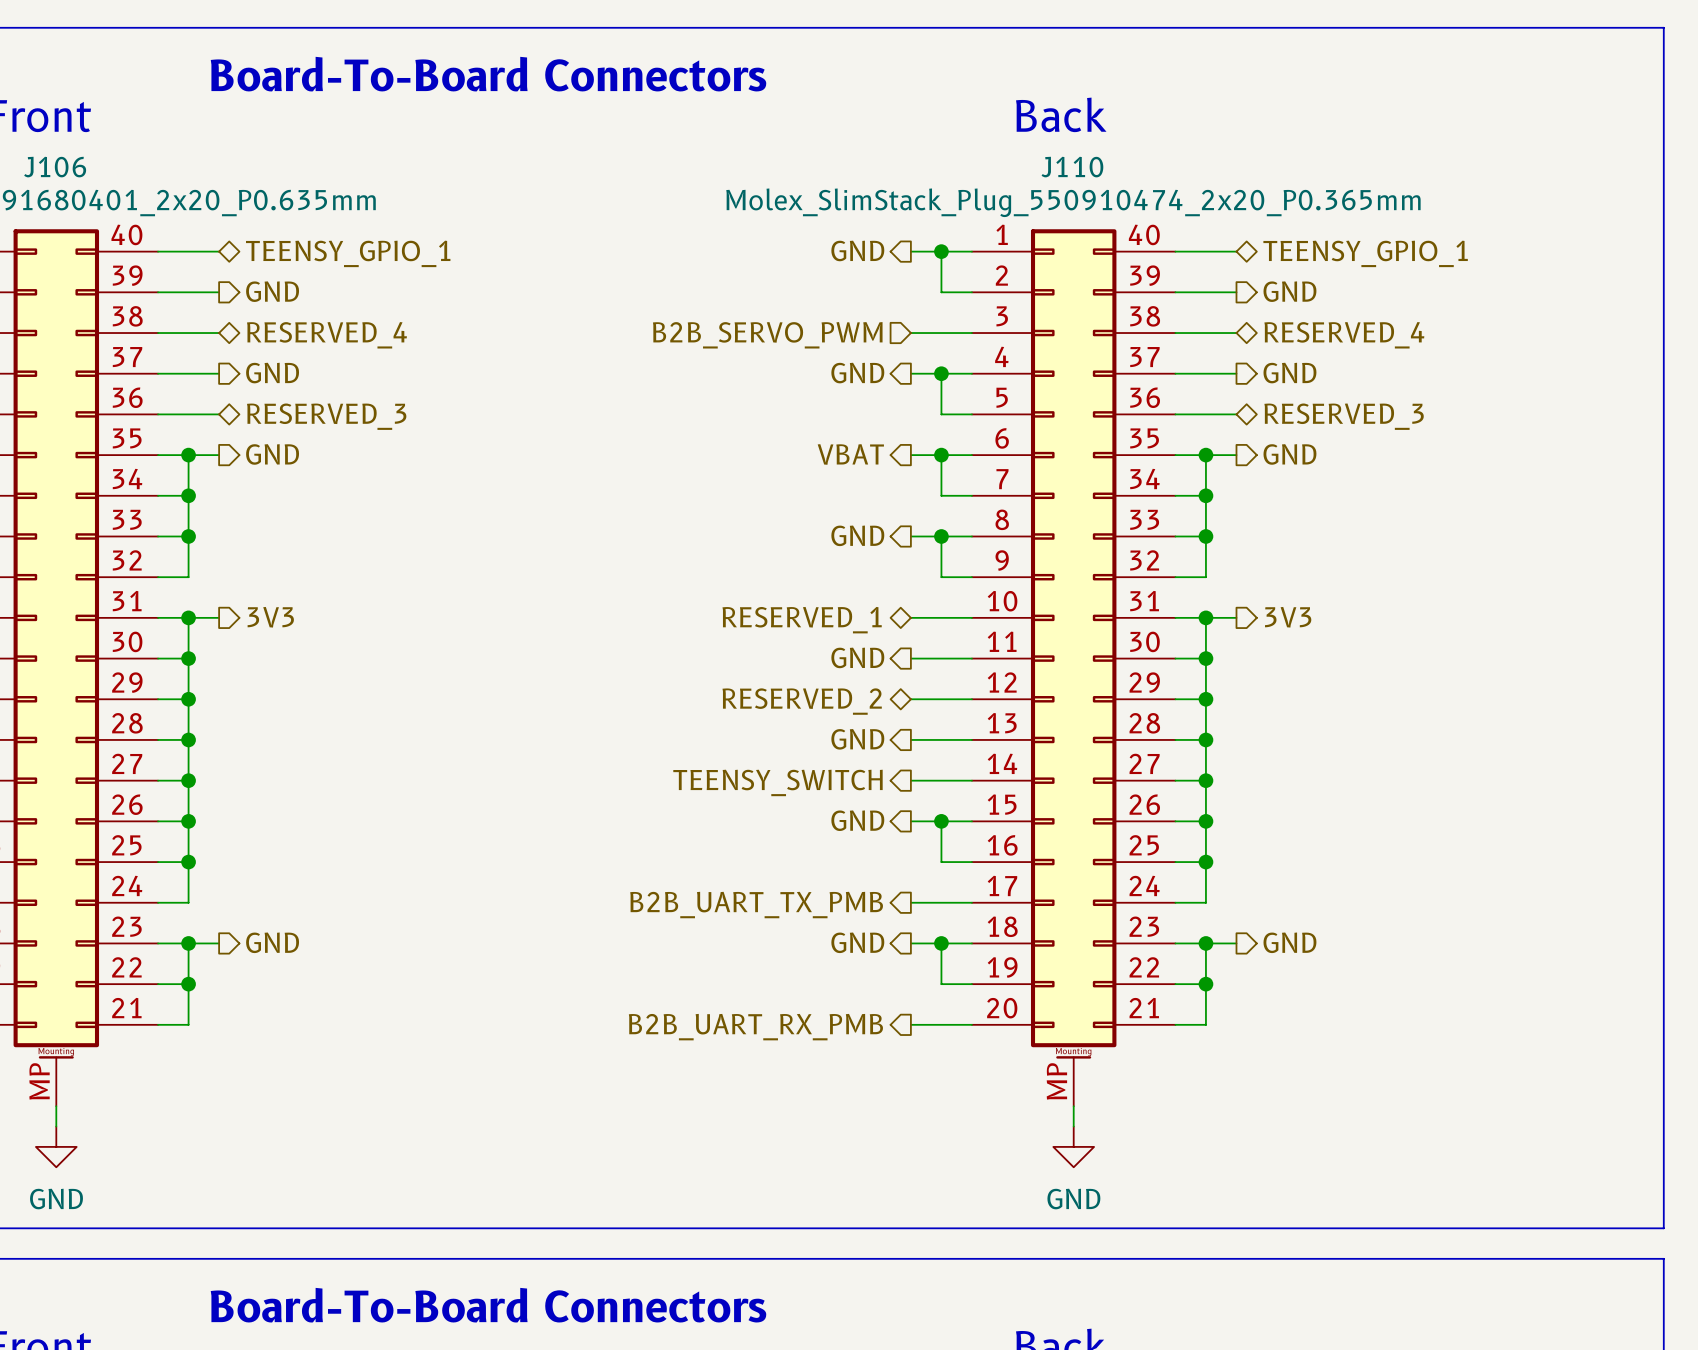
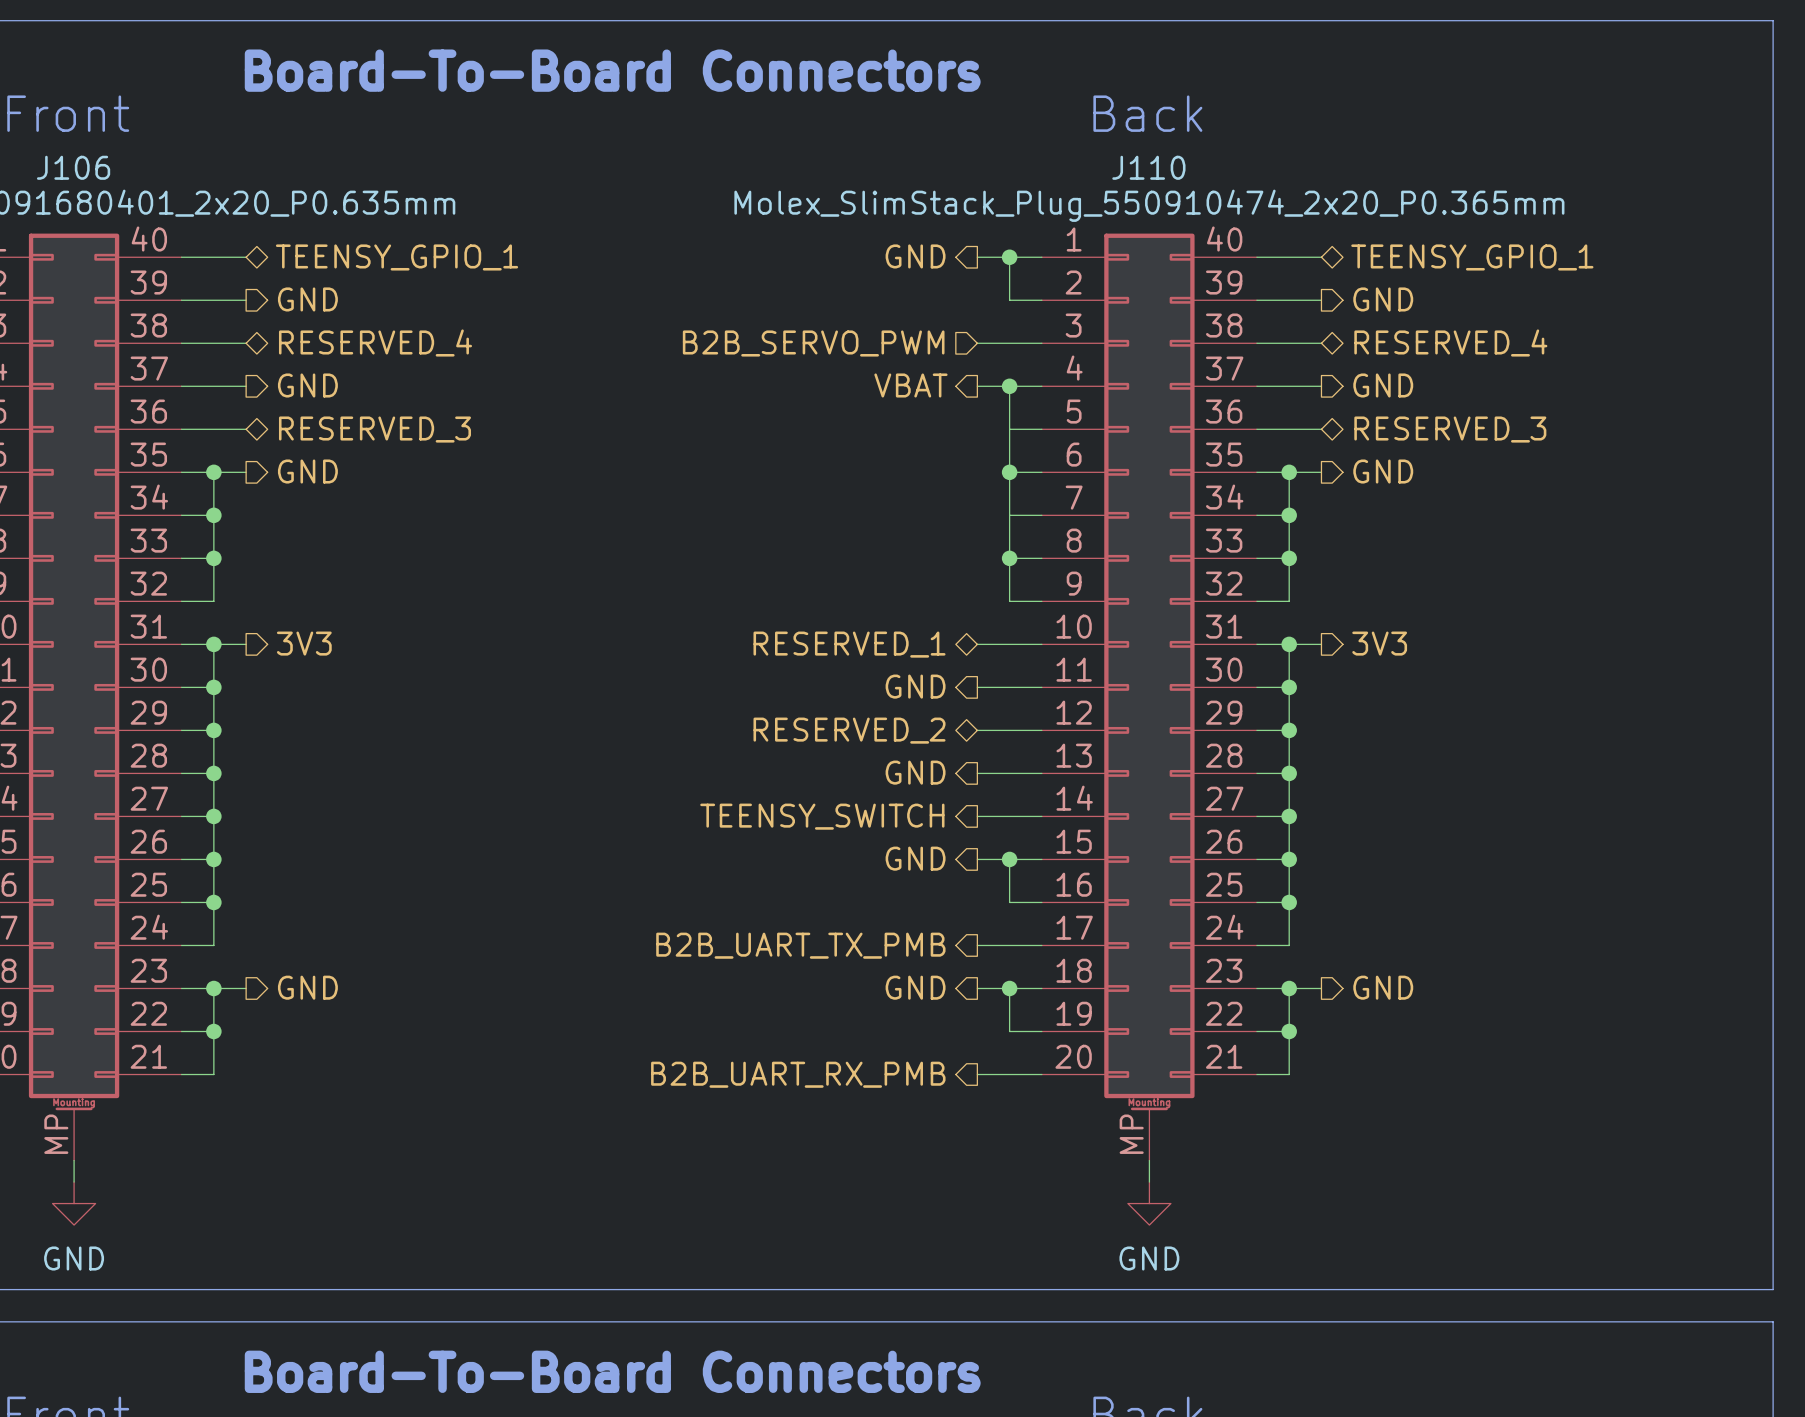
hierarchical label: GND (857, 373) -> VBAT (910, 385)
hierarchical label: VBAT (850, 454) -> none
wire: (910, 455) (941, 455) -> (1009, 429) (1009, 472)
hierarchical label: GND (857, 535) -> none
wire: (910, 536) (941, 536) -> (1009, 515) (1009, 558)

